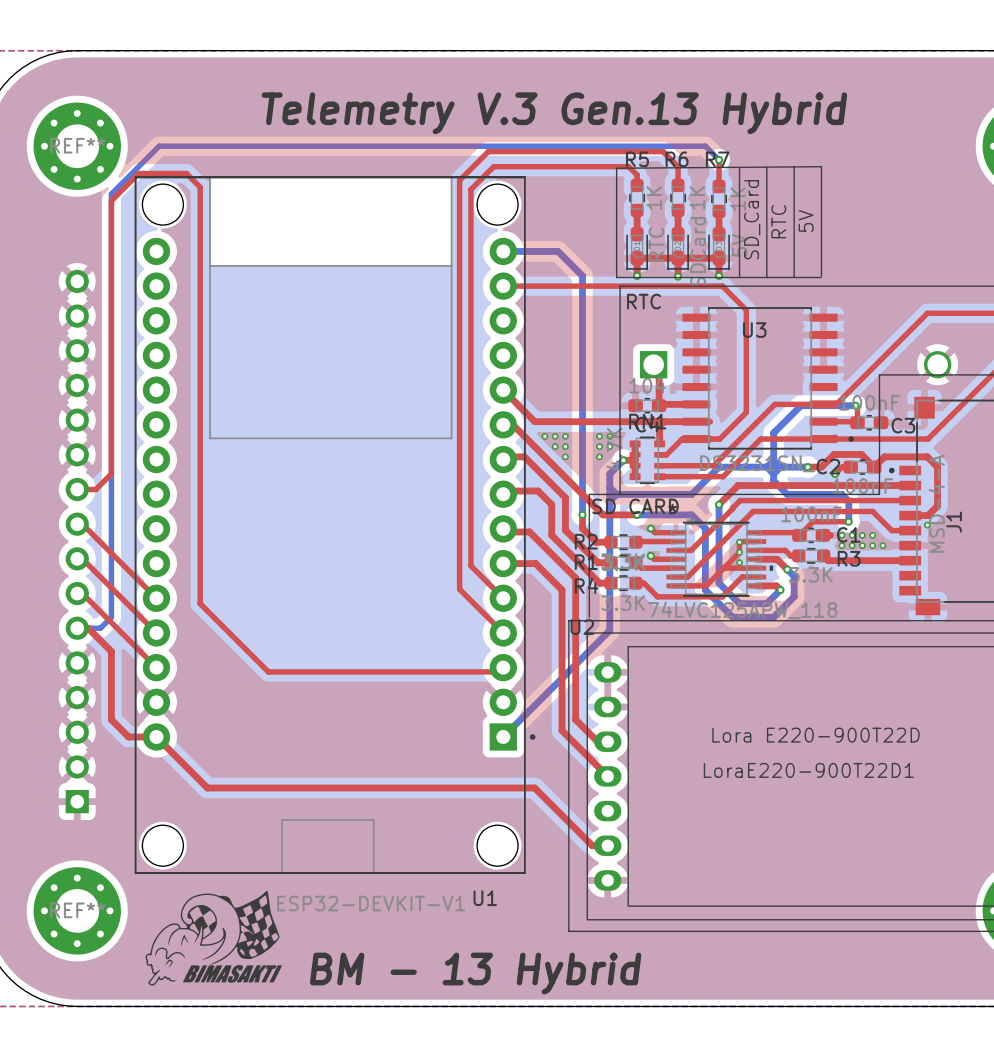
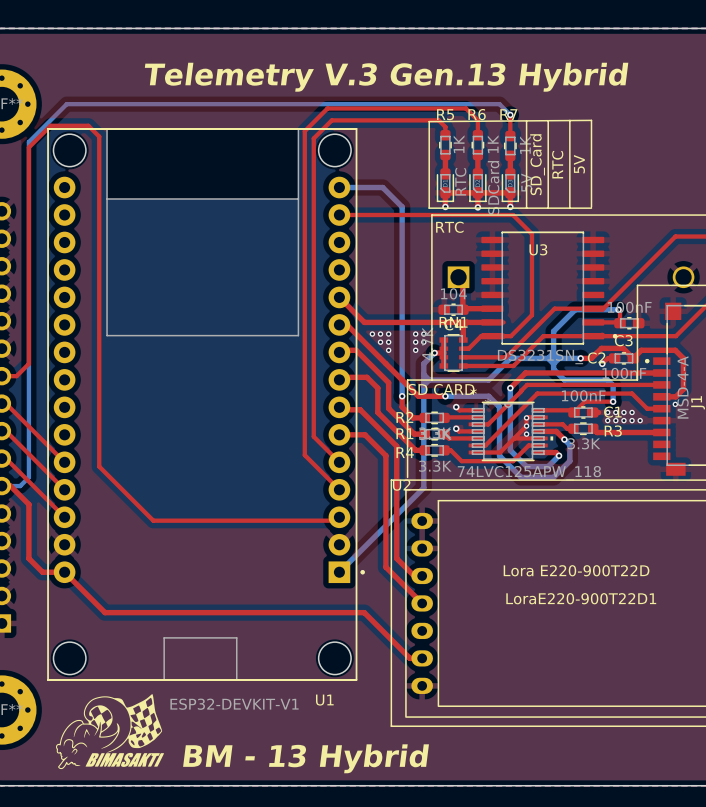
C3 name position: C3 (903, 425) -> C3 (623, 340)

